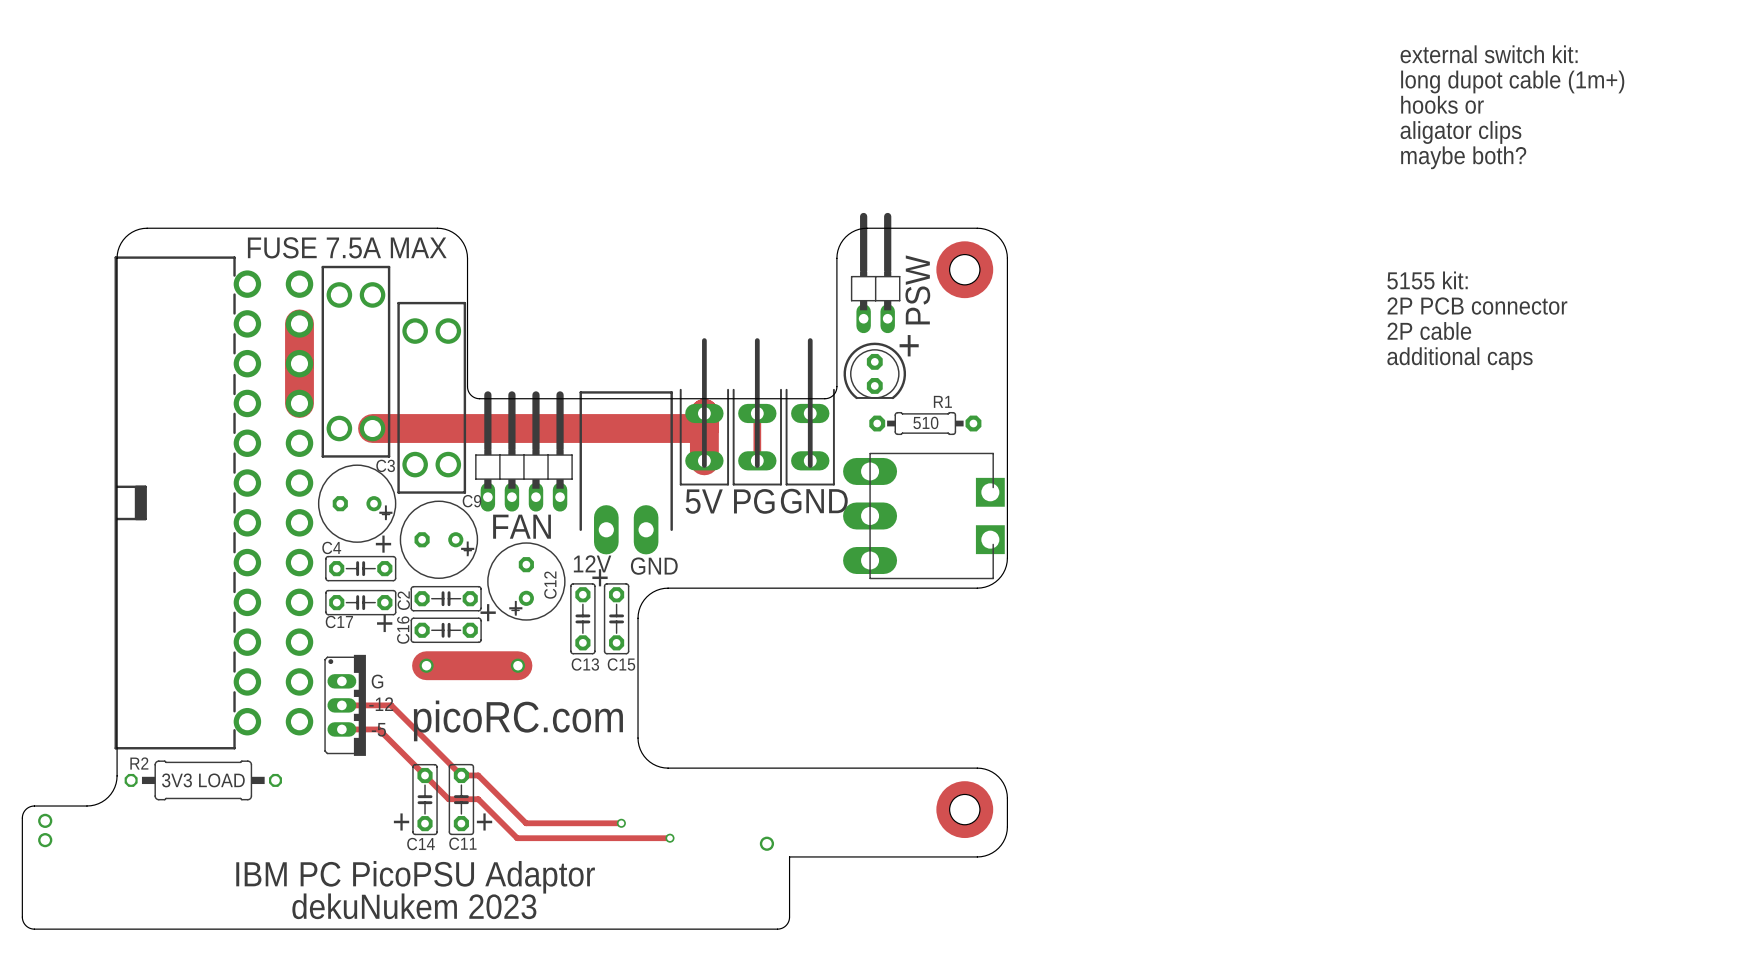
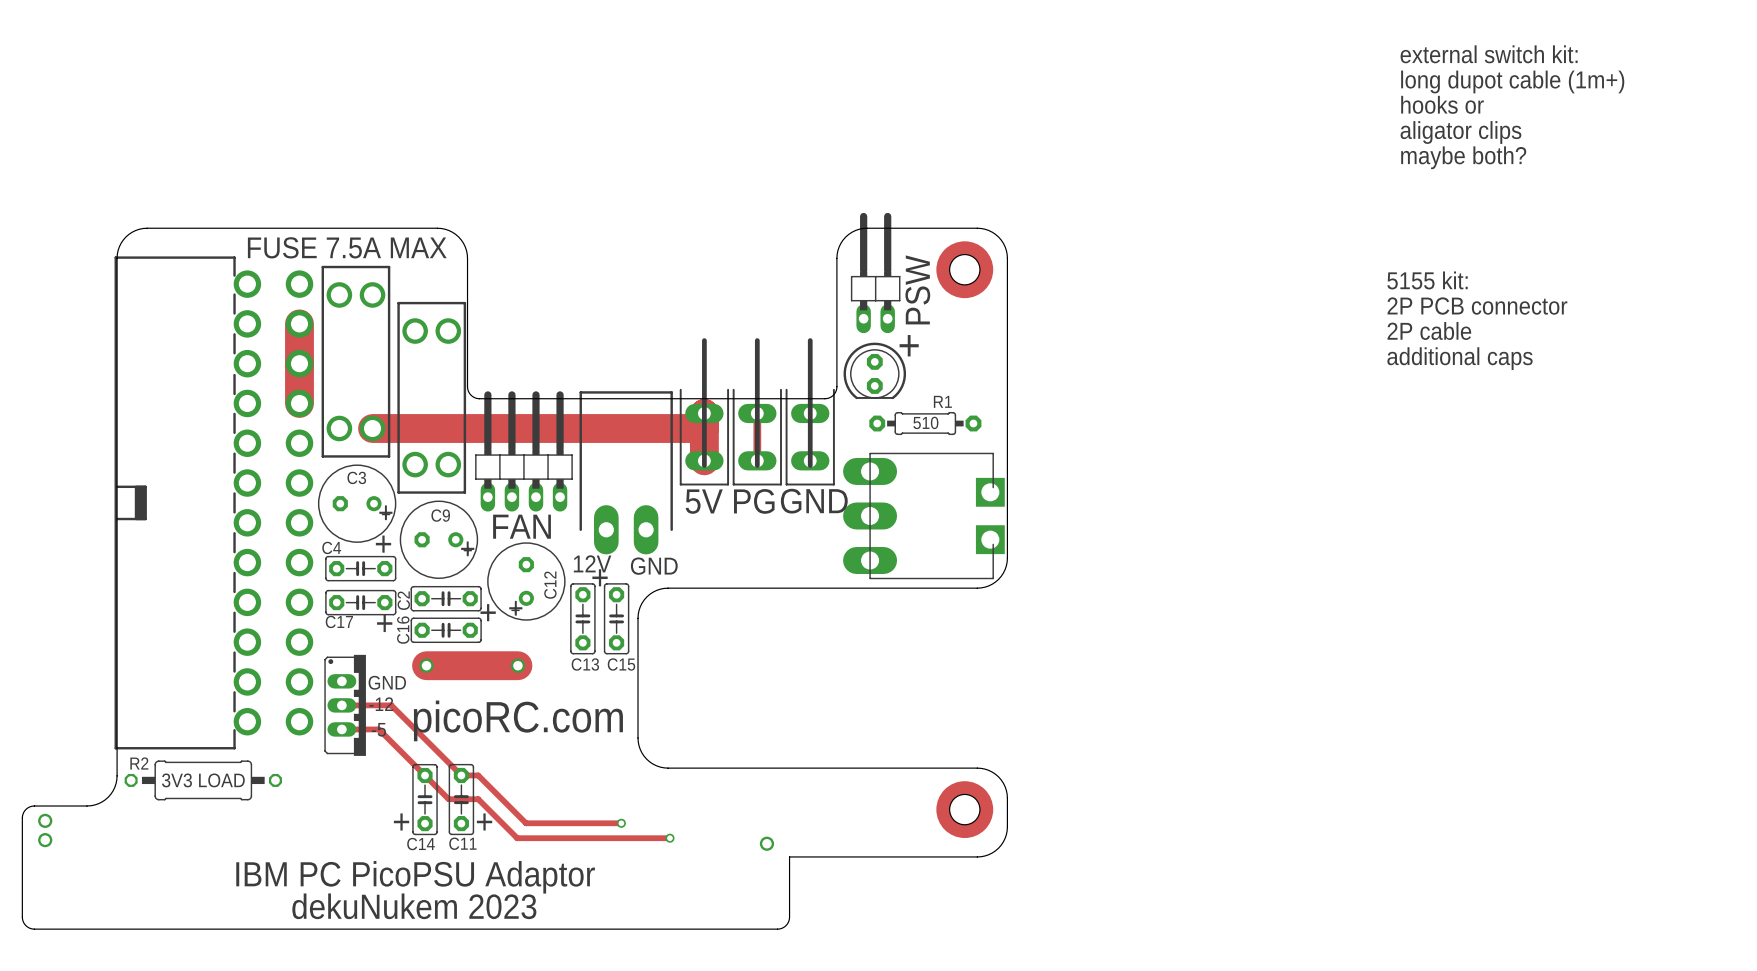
C3 name position: C3 (385, 465) -> C3 (356, 477)
C9 name position: C9 (471, 501) -> C9 (440, 515)
text: G (377, 681) -> none
text: none -> GND (387, 682)

